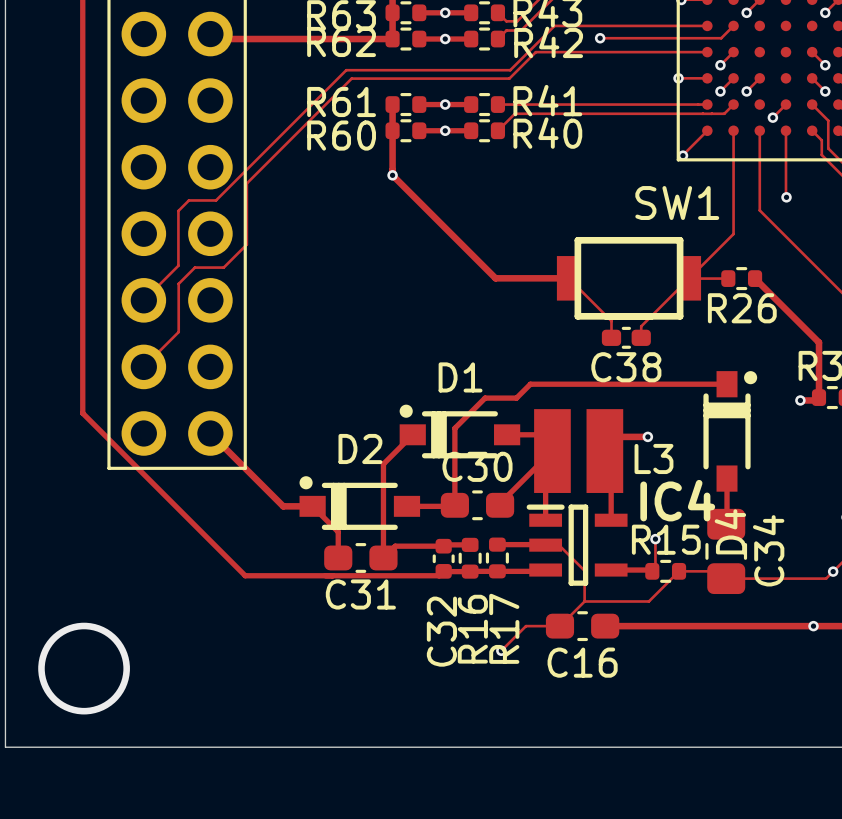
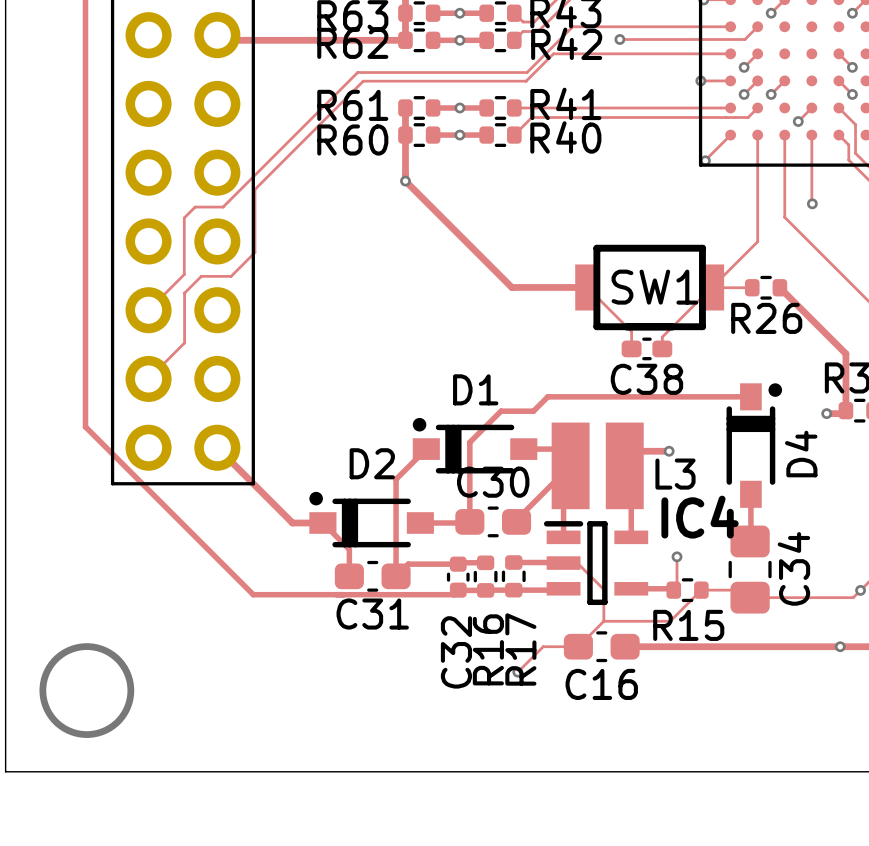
SW1 name position: SW1 (677, 203) -> SW1 (654, 287)
D4 name position: D4 (730, 531) -> D4 (801, 454)
R15 name position: R15 (666, 539) -> R15 (688, 625)

